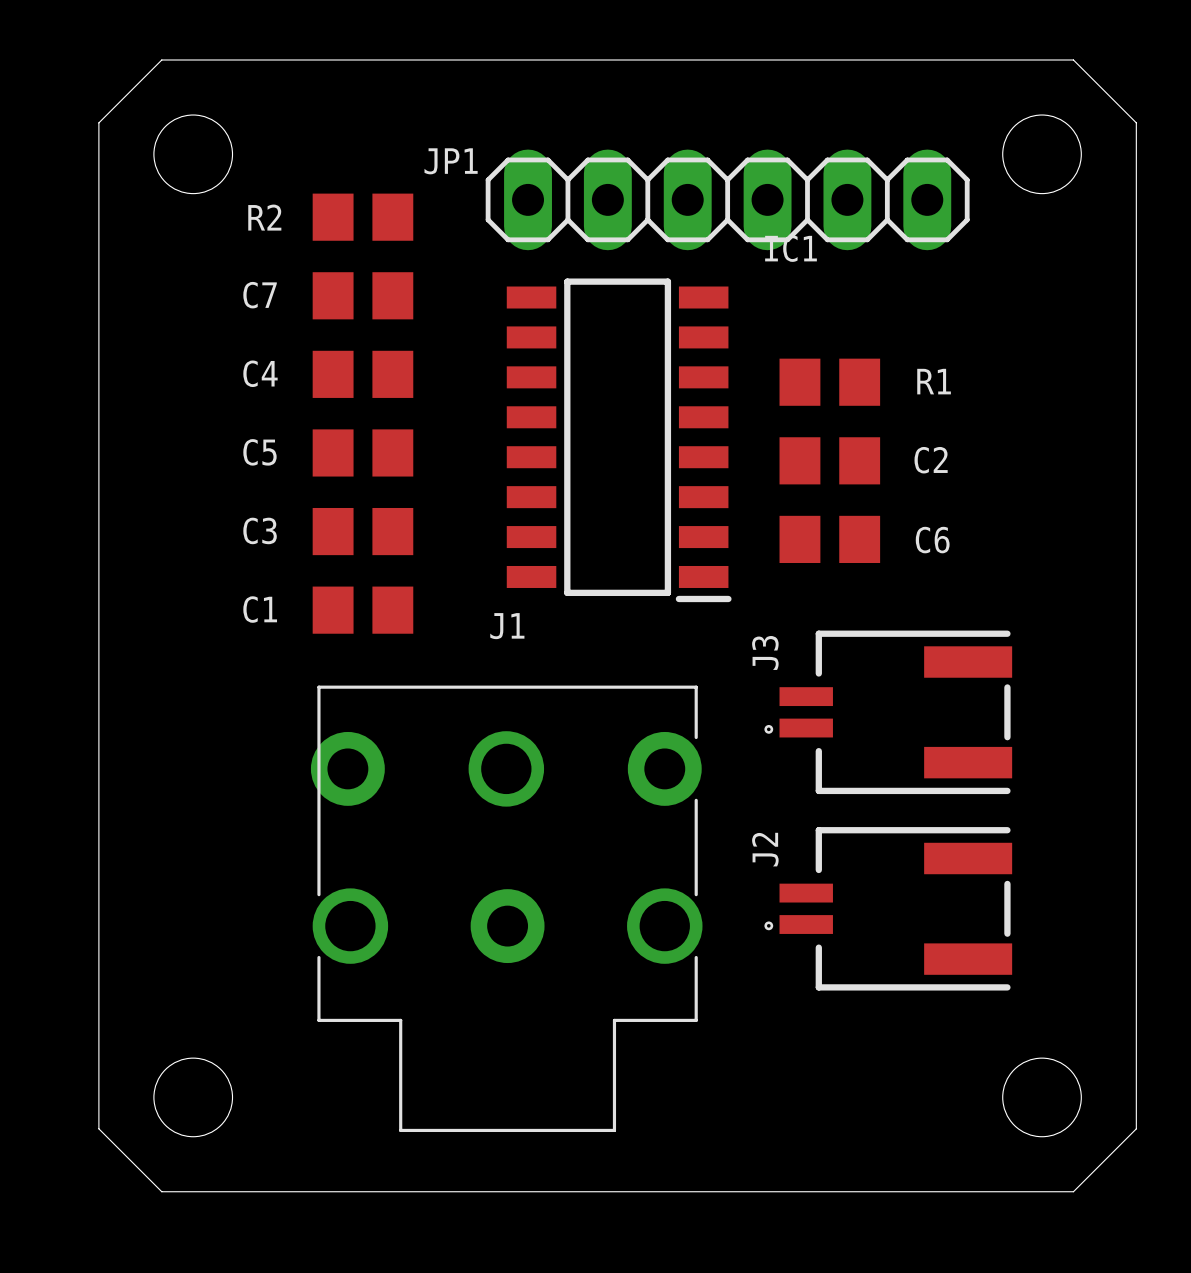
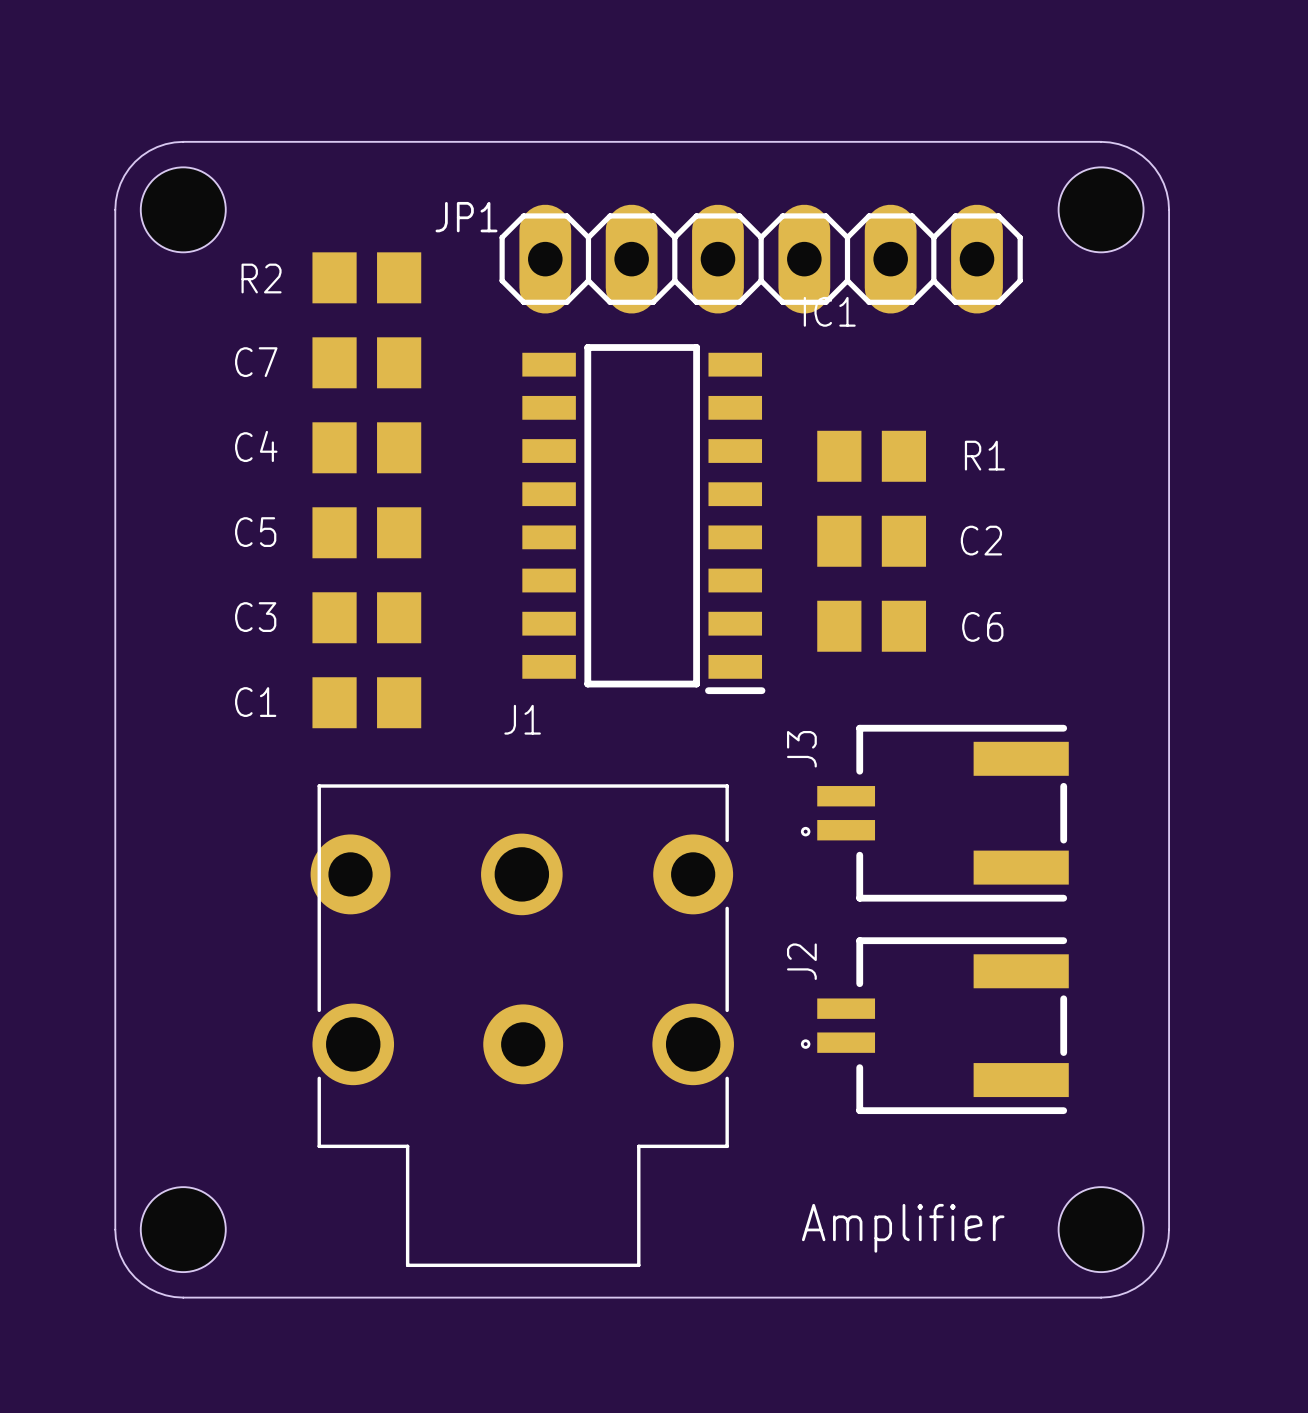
board edge: (161, 60) (1073, 60) (1136, 122) (1136, 1128) (1073, 1191) (161, 1191) (98, 1128) (98, 122) (161, 60) -> (183, 141) (157, 147) (135, 161) (120, 183) (115, 209) (115, 1229) (120, 1255) (129, 1271) (141, 1283) (157, 1292) (183, 1297) (1101, 1297) (1127, 1292) (1142, 1283) (1155, 1271) (1163, 1255) (1169, 1229) (1169, 209) (1163, 183) (1155, 168) (1142, 155) (1127, 147) (1101, 141) (183, 141)
text: none -> Amplifier (903, 1228)

